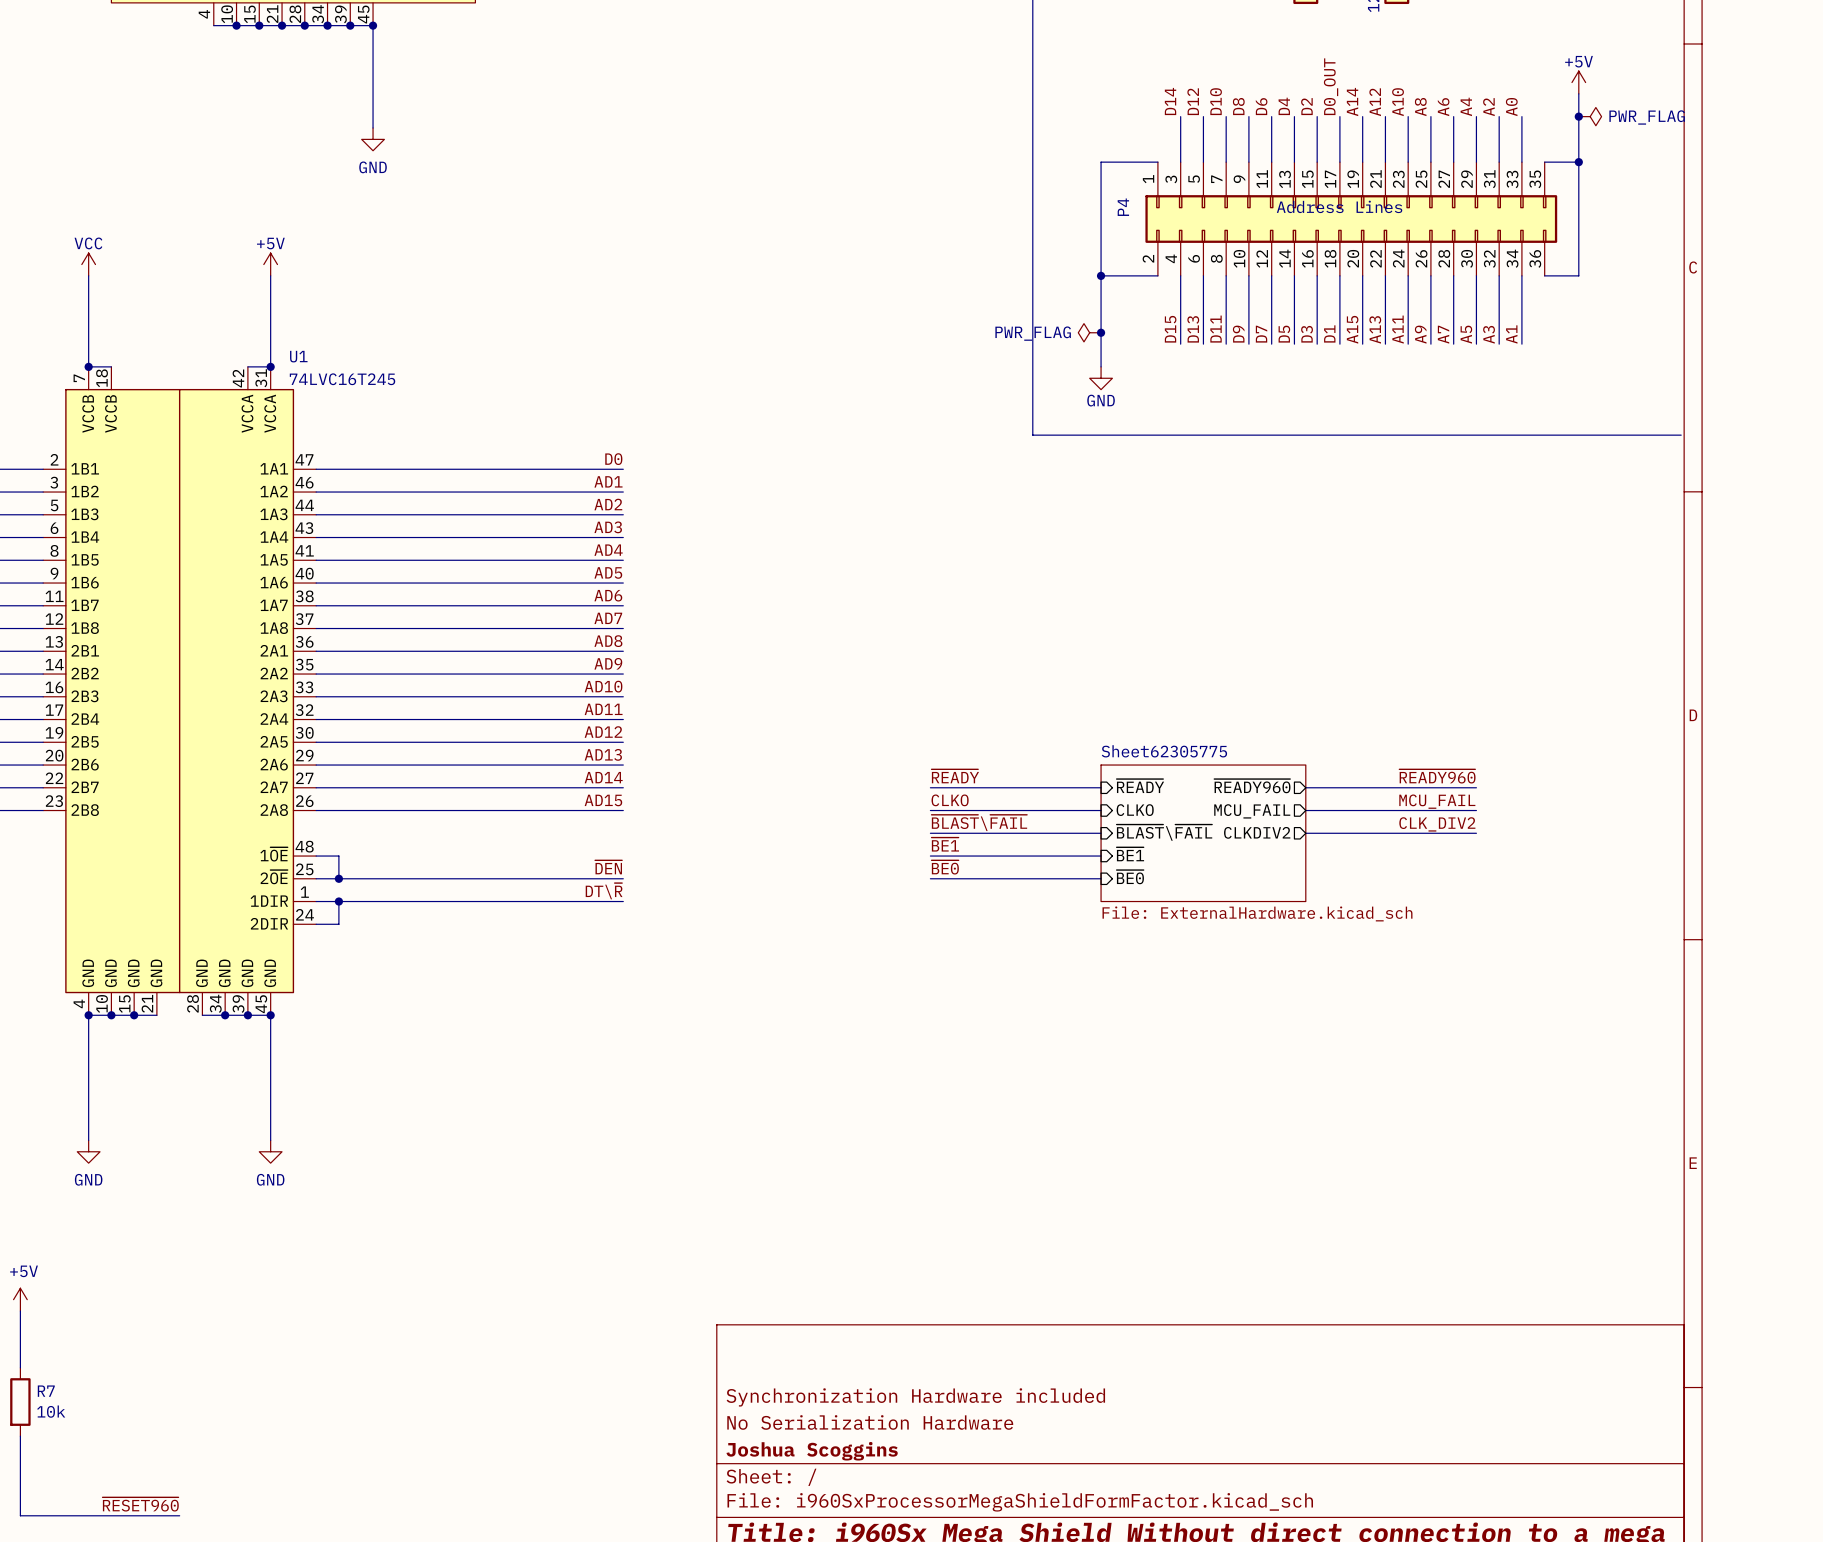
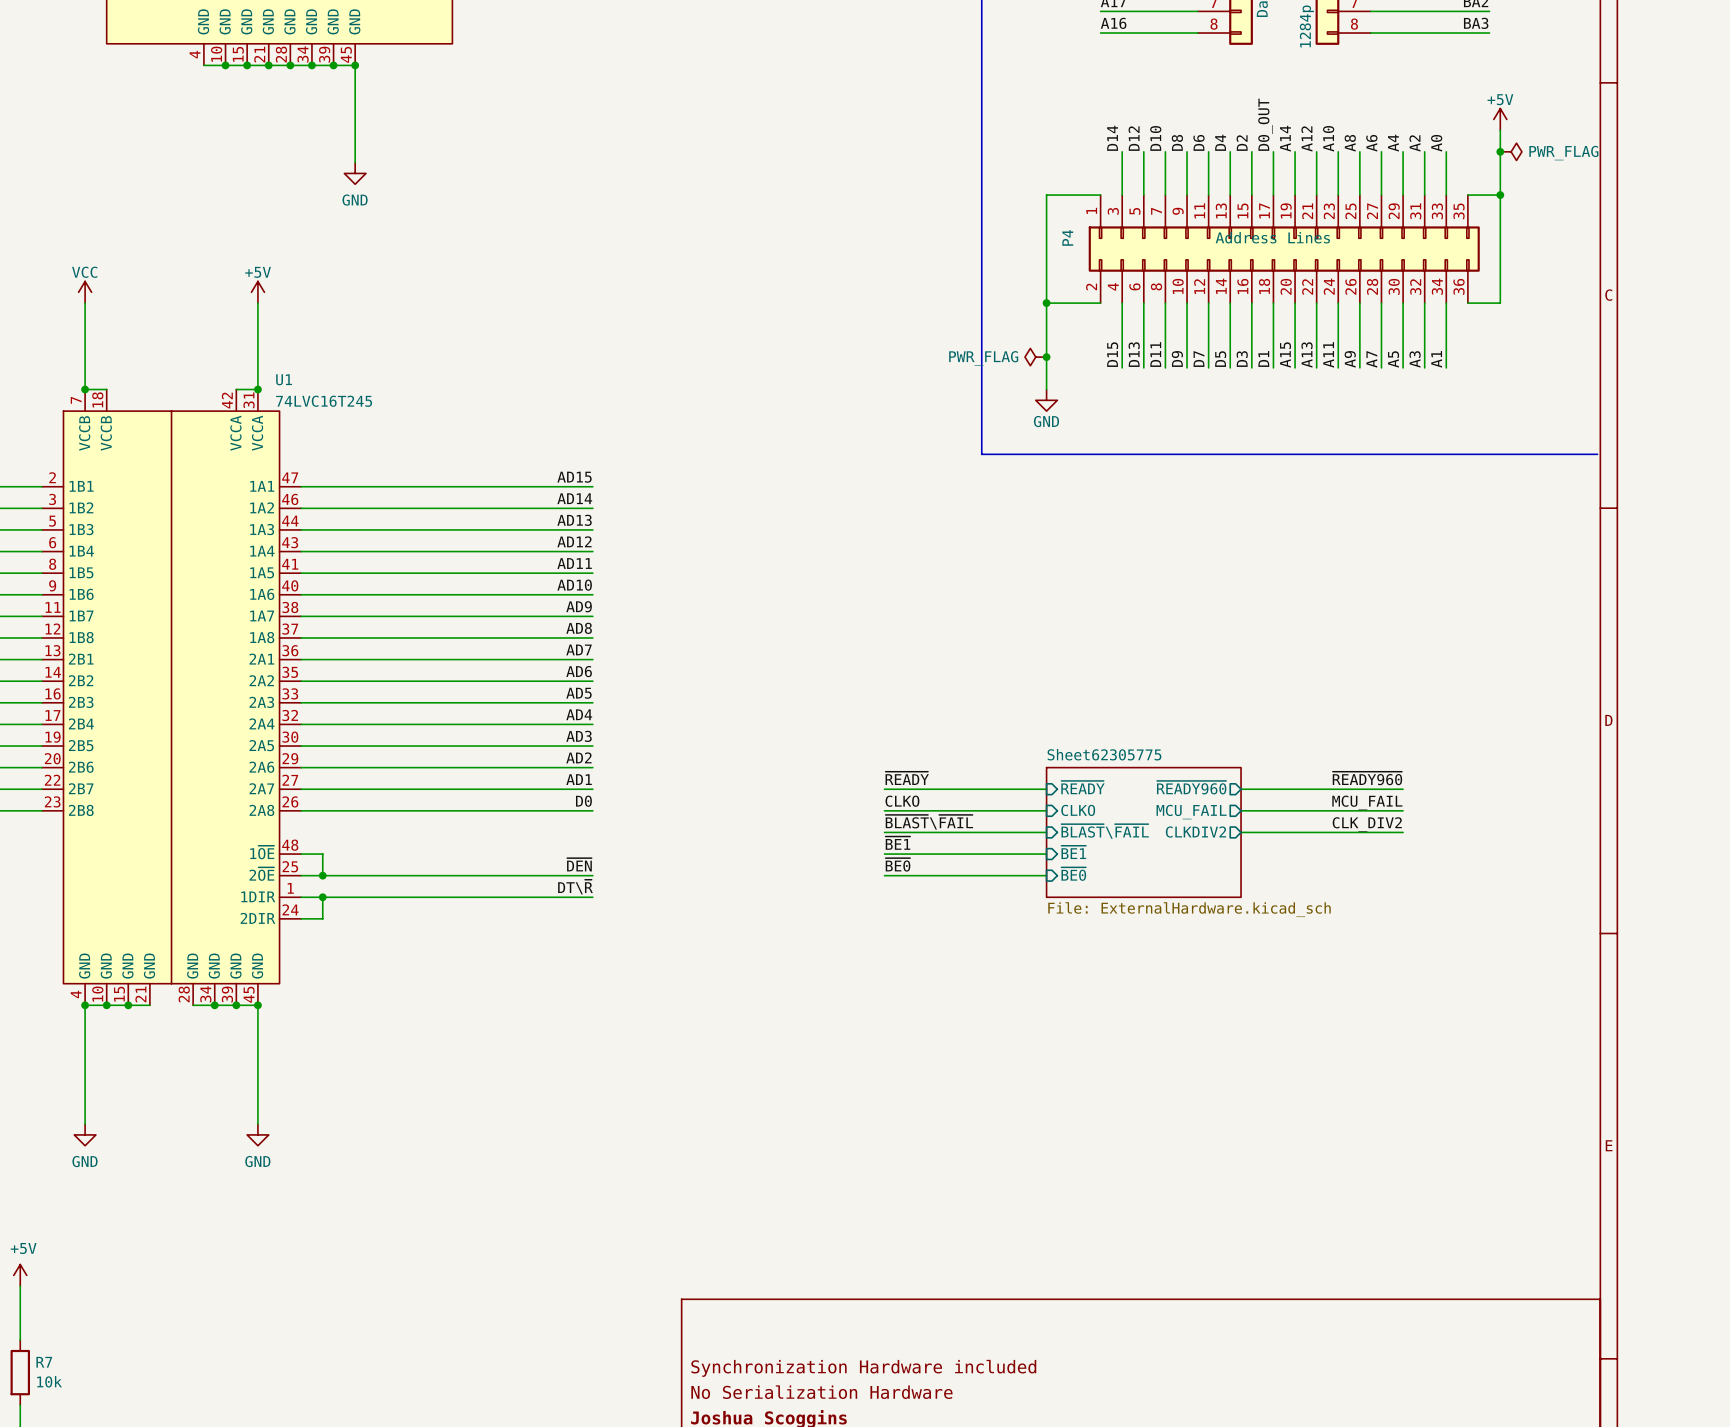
label: D0 (613, 459) -> AD15 (574, 477)
label: AD1 (608, 481) -> AD14 (574, 498)
label: AD2 (608, 504) -> AD13 (574, 520)
label: AD3 (608, 527) -> AD12 (574, 541)
label: AD4 (608, 550) -> AD11 (574, 563)
label: AD5 (608, 572) -> AD10 (574, 585)
label: AD6 (608, 595) -> AD9 (579, 606)
label: AD7 (608, 618) -> AD8 (579, 628)
label: AD8 (608, 641) -> AD7 (579, 649)
label: AD9 (608, 663) -> AD6 (579, 671)
label: AD10 (603, 686) -> AD5 (579, 693)
label: AD11 (603, 709) -> AD4 (579, 714)
label: AD12 (603, 732) -> AD3 (579, 736)
label: AD13 (603, 754) -> AD2 (578, 757)
label: AD14 (603, 777) -> AD1 (579, 779)
label: AD15 (603, 800) -> D0 (583, 801)

